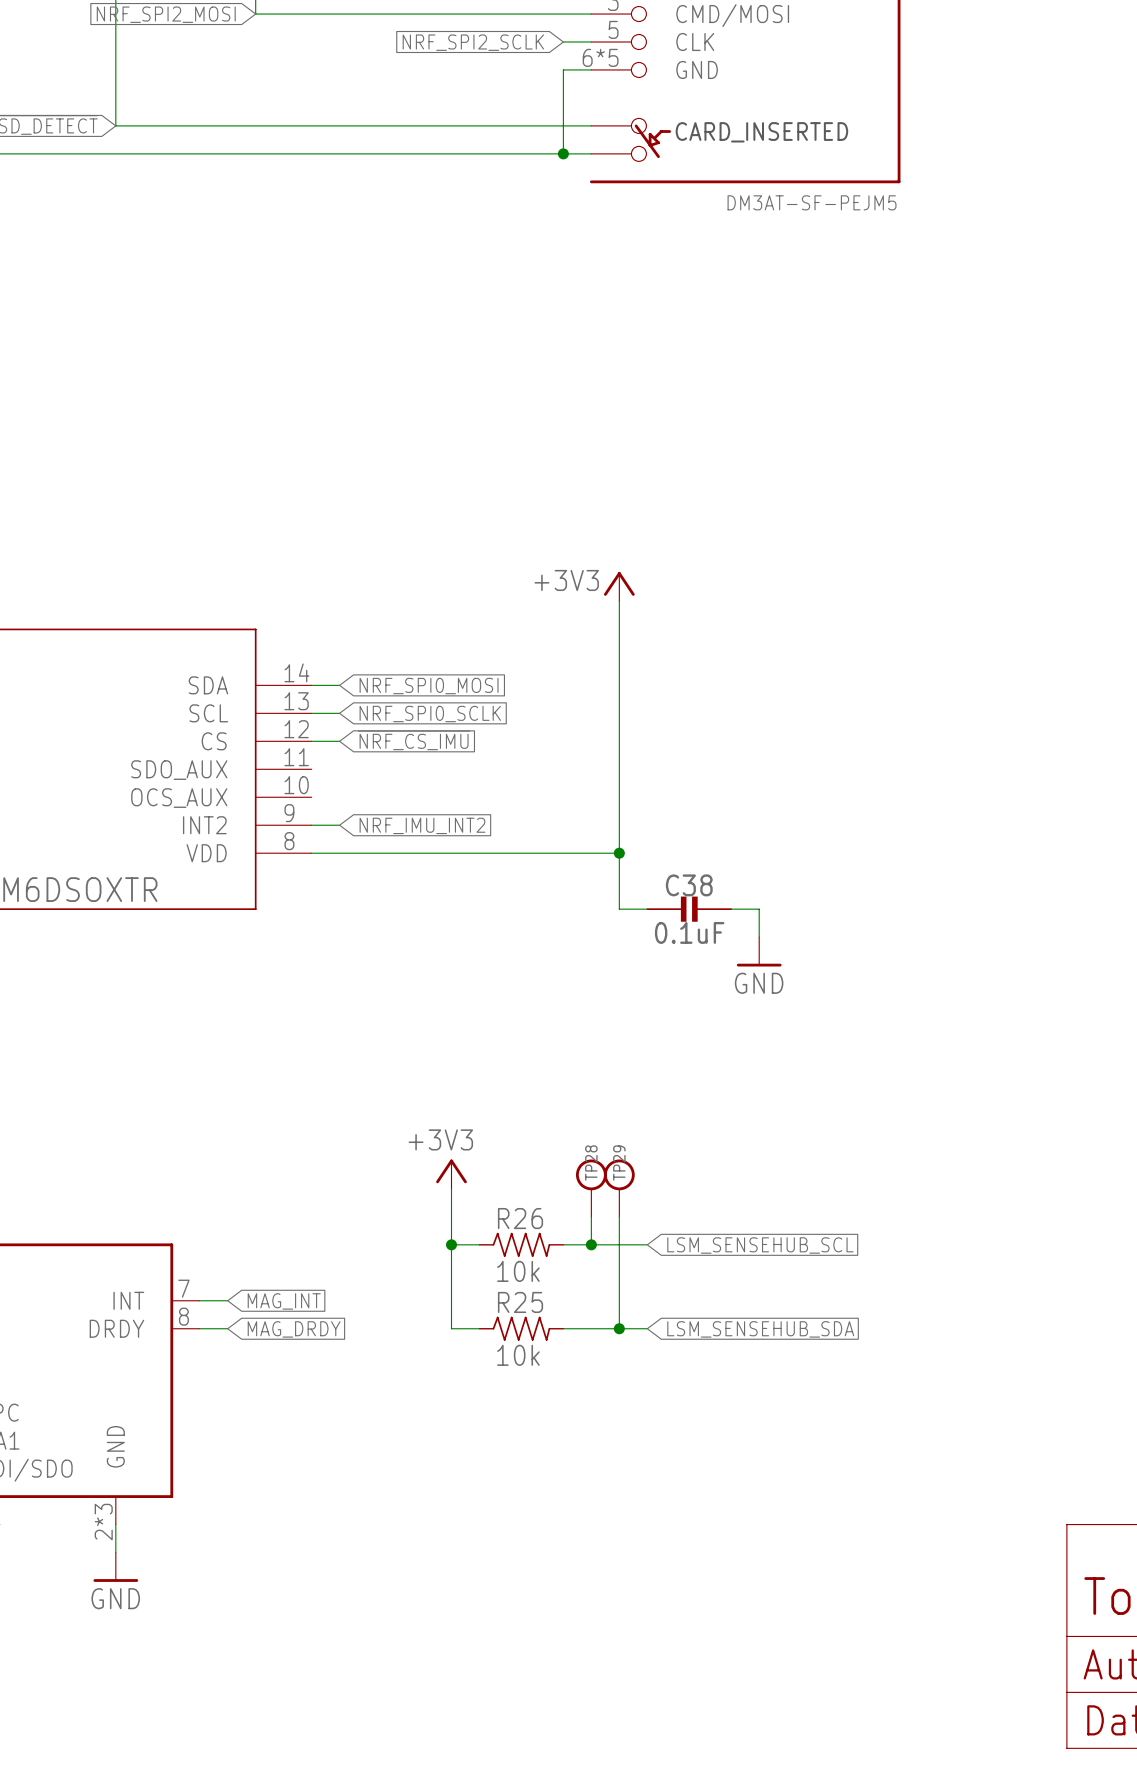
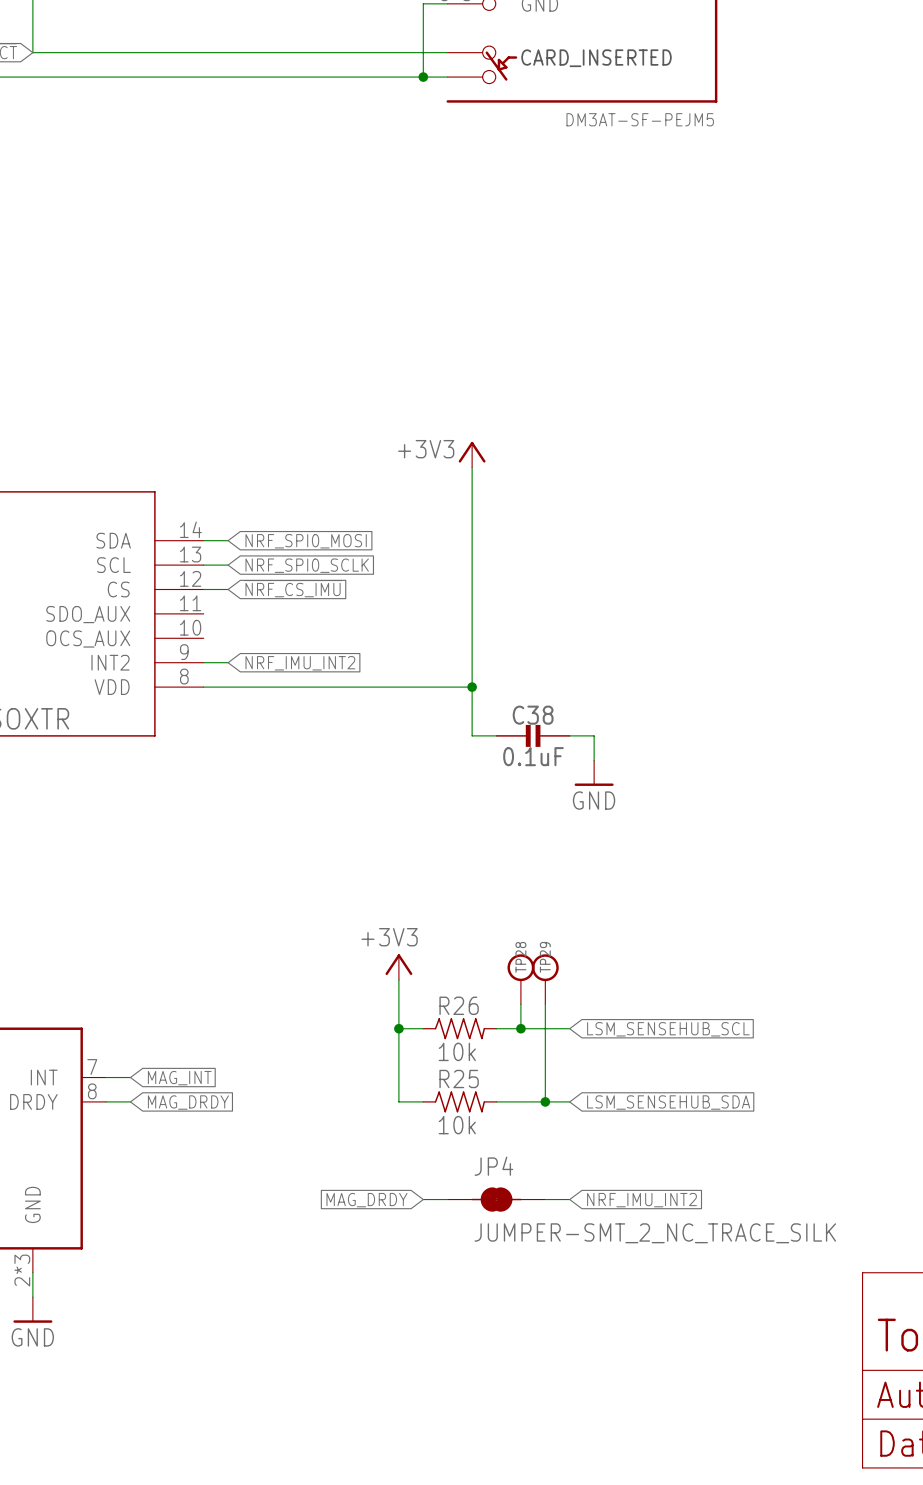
power symbol position: +3V3 (451, 1174) -> +3V3 (398, 967)
wire: (451, 1188) (451, 1328) (479, 1328) -> (398, 979) (398, 1101) (423, 1101)
TP28 position: (591, 1188) -> (520, 979)
TP29 position: (619, 1188) -> (545, 979)
wire: (591, 1216) (591, 1244) -> (520, 1004) (520, 1028)
wire: (619, 1216) (619, 1328) -> (545, 1004) (545, 1101)
wire: (451, 1244) (479, 1244) -> (423, 1199) (447, 1199)
junction: (451, 1244) -> none
R26 position: (521, 1244) -> (459, 1028)
junction: none -> (398, 1028)
junction: (591, 1244) -> none
wire: none -> (496, 1028) (569, 1028)
junction: none -> (520, 1028)
global label position: LSM_SENSEHUB_SCL (760, 1245) -> LSM_SENSEHUB_SCL (668, 1029)
R25 position: (521, 1328) -> (459, 1101)
wire: (563, 1328) (647, 1328) -> (569, 1101) (496, 1101)
junction: (619, 1328) -> none
junction: none -> (545, 1101)
global label position: LSM_SENSEHUB_SDA (760, 1329) -> LSM_SENSEHUB_SDA (668, 1102)
JP4: none -> JUMPER-SMT_2_NC_TRACE_SILK (496, 1199)
wire: none -> (545, 1199) (569, 1199)
global label: none -> MAG_DRDY (366, 1200)
global label: none -> NRF_IMU_INT2 (642, 1200)

